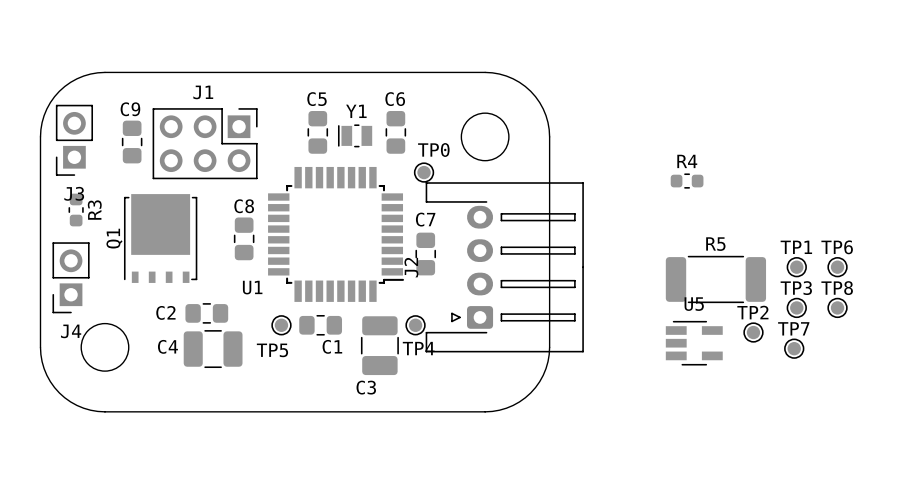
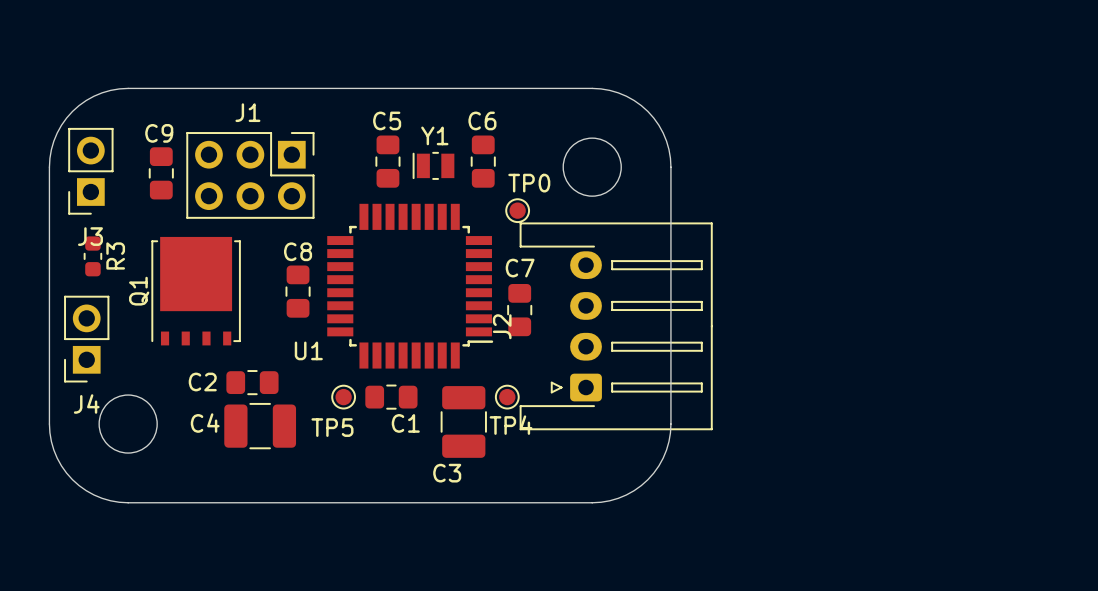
R4: (687, 181) -> none
TP1: (796, 267) -> none
TP6: (837, 267) -> none
R5: (715, 279) -> none
TP3: (796, 307) -> none
TP8: (837, 307) -> none
TP2: (753, 332) -> none
U5: (694, 343) -> none
TP7: (794, 348) -> none

